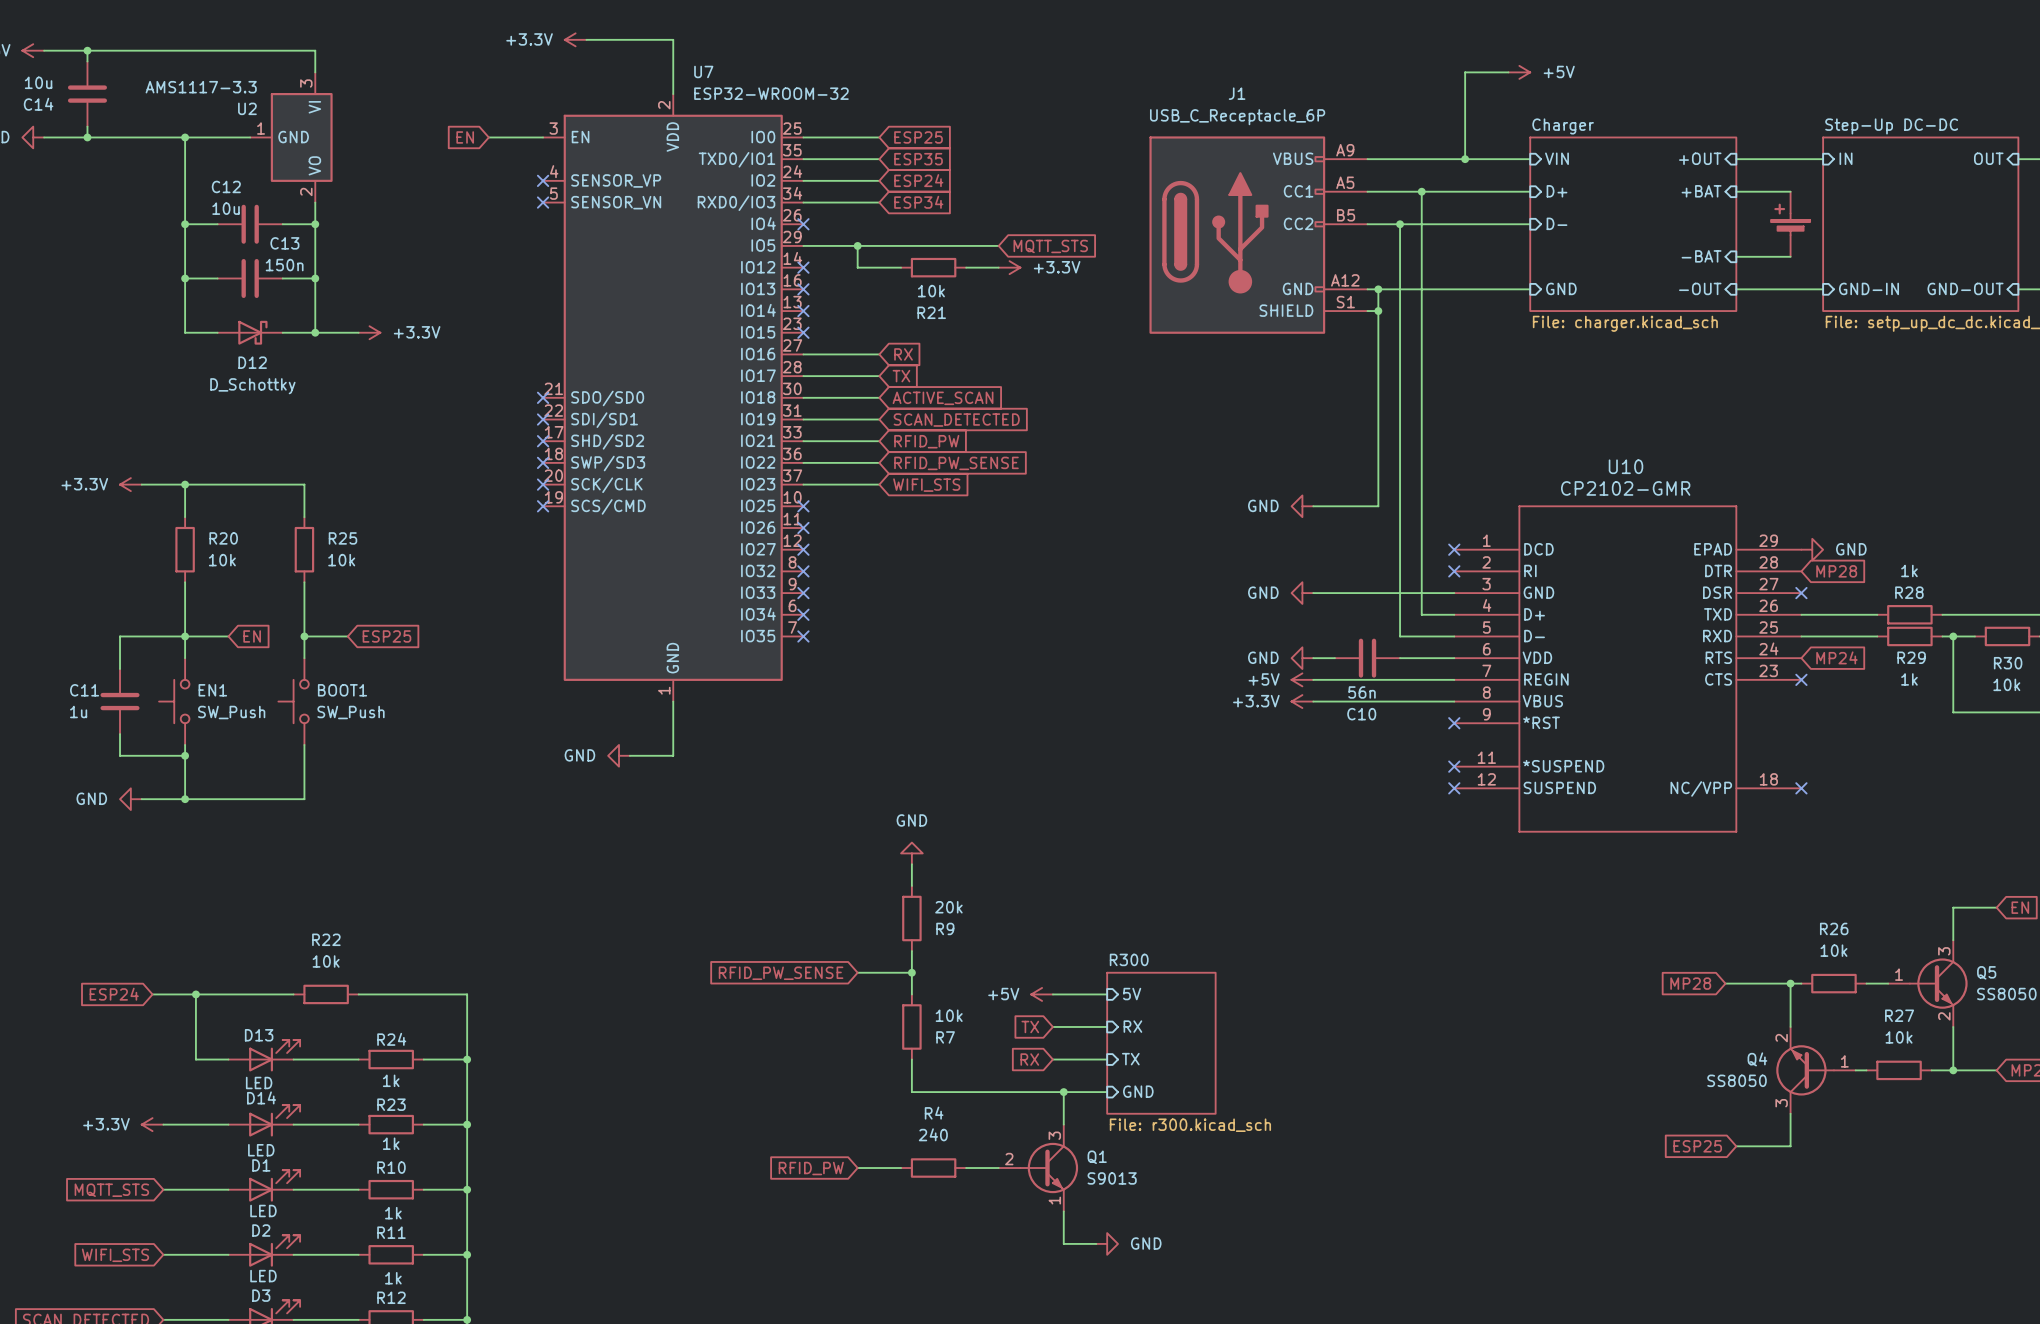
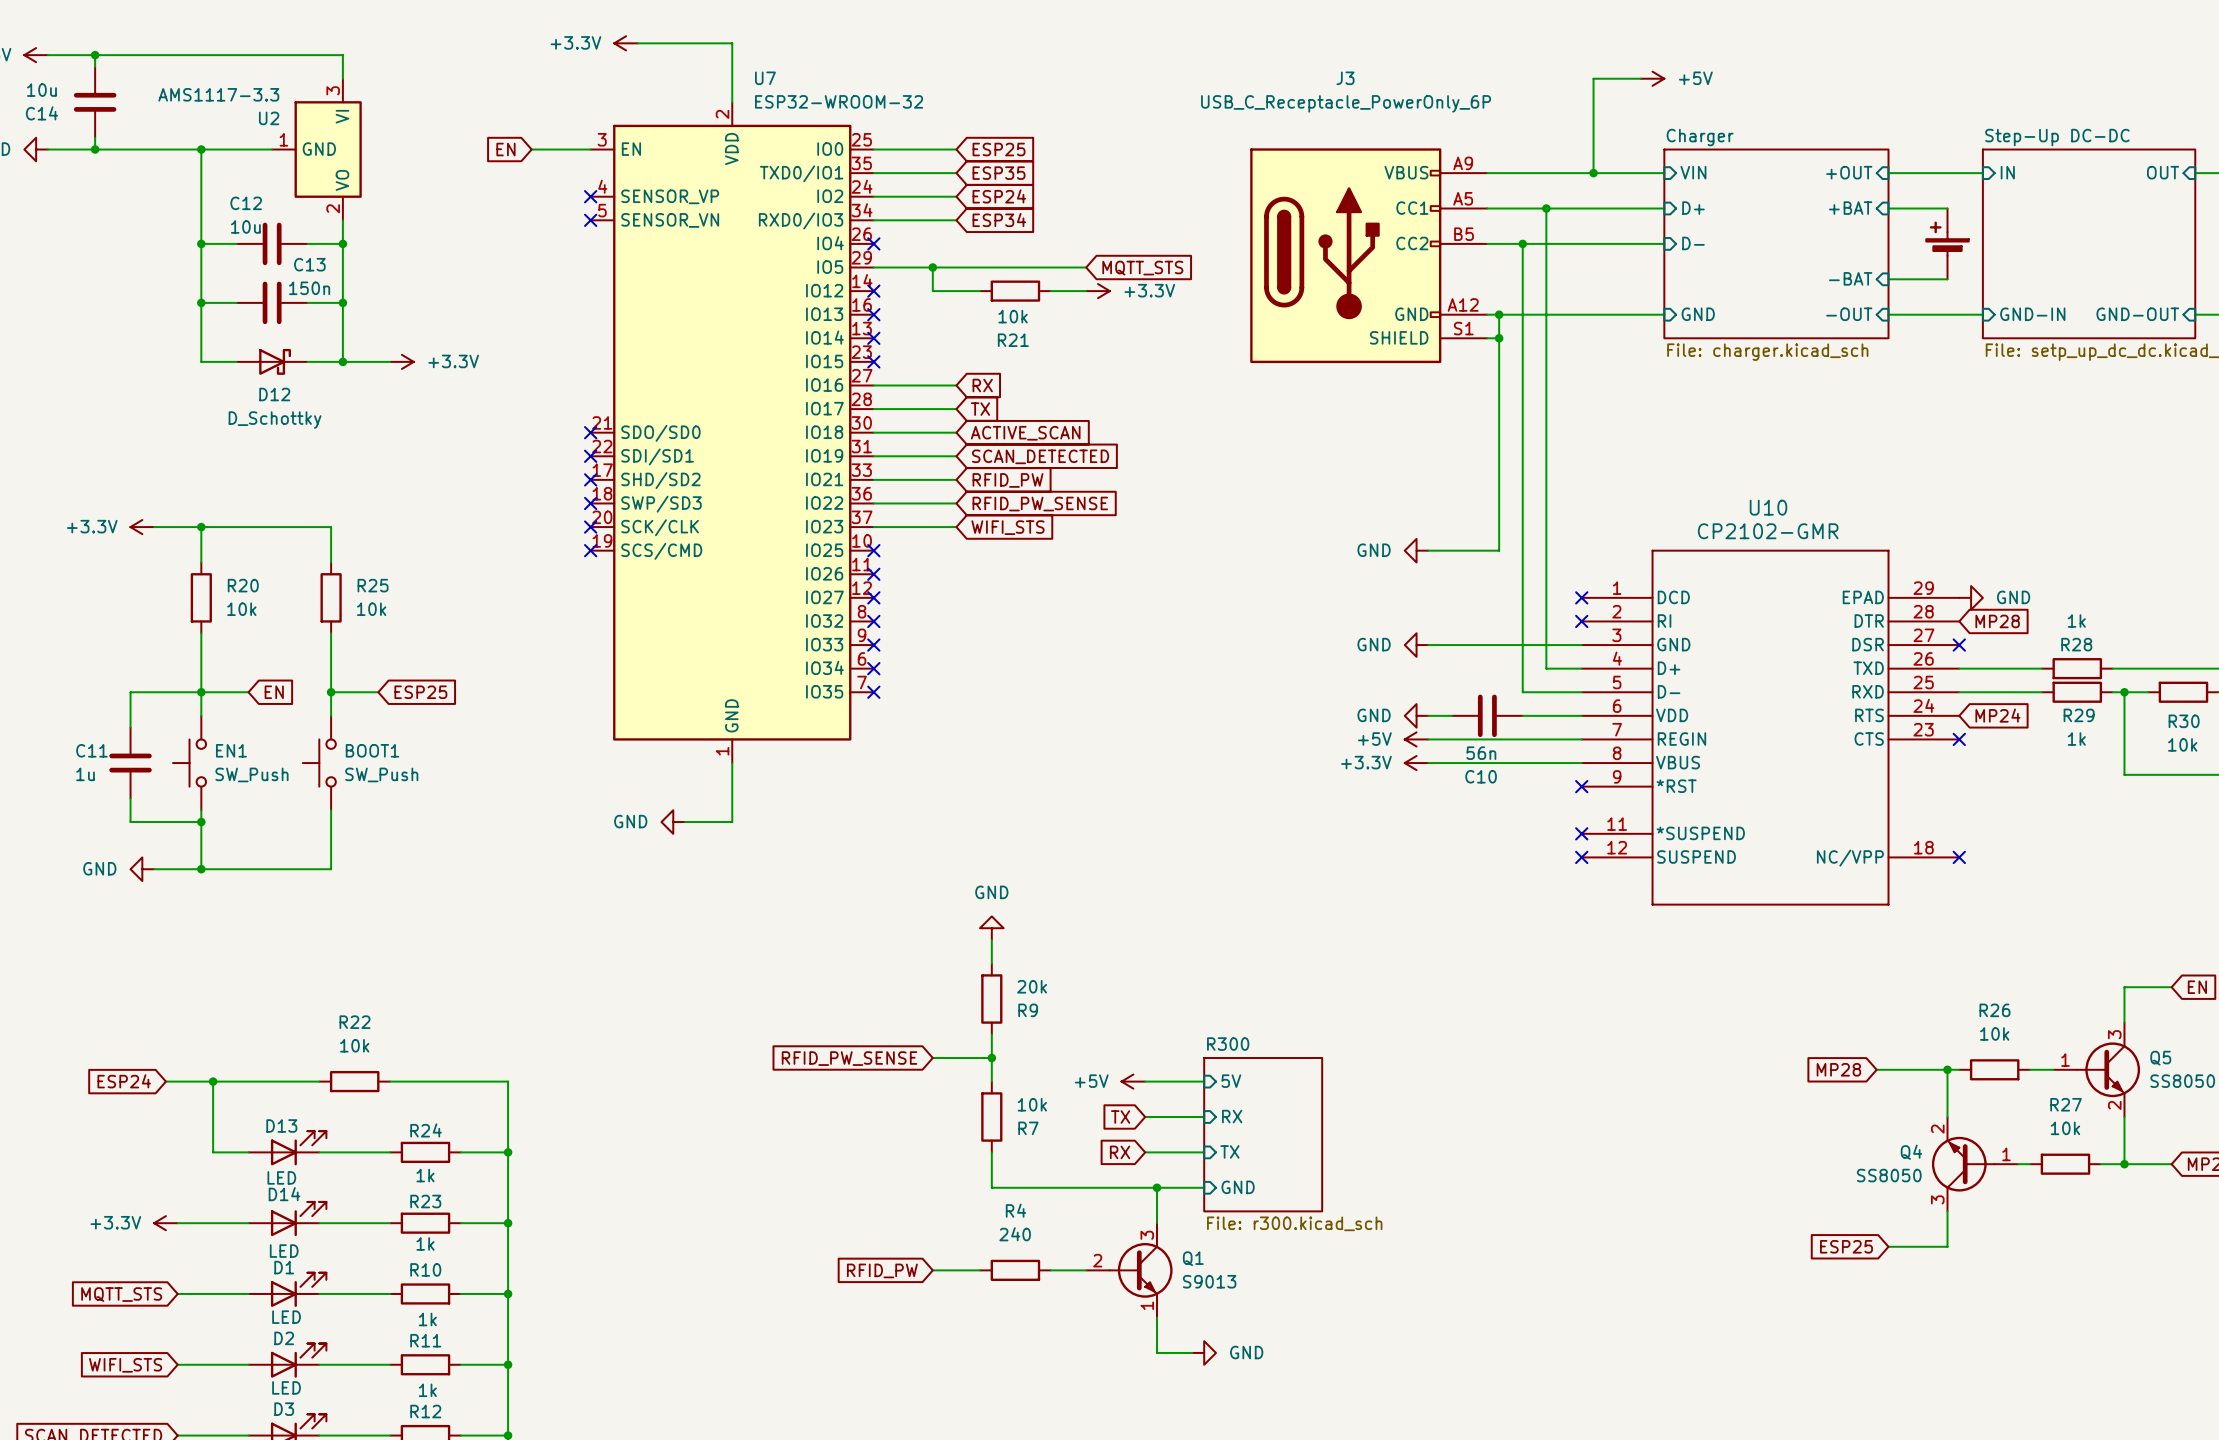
J1 name: J1 (1237, 93) -> J3 (1345, 78)
J1 value: USB_C_Receptacle_6P (1237, 117) -> USB_C_Receptacle_PowerOnly_6P (1346, 103)

